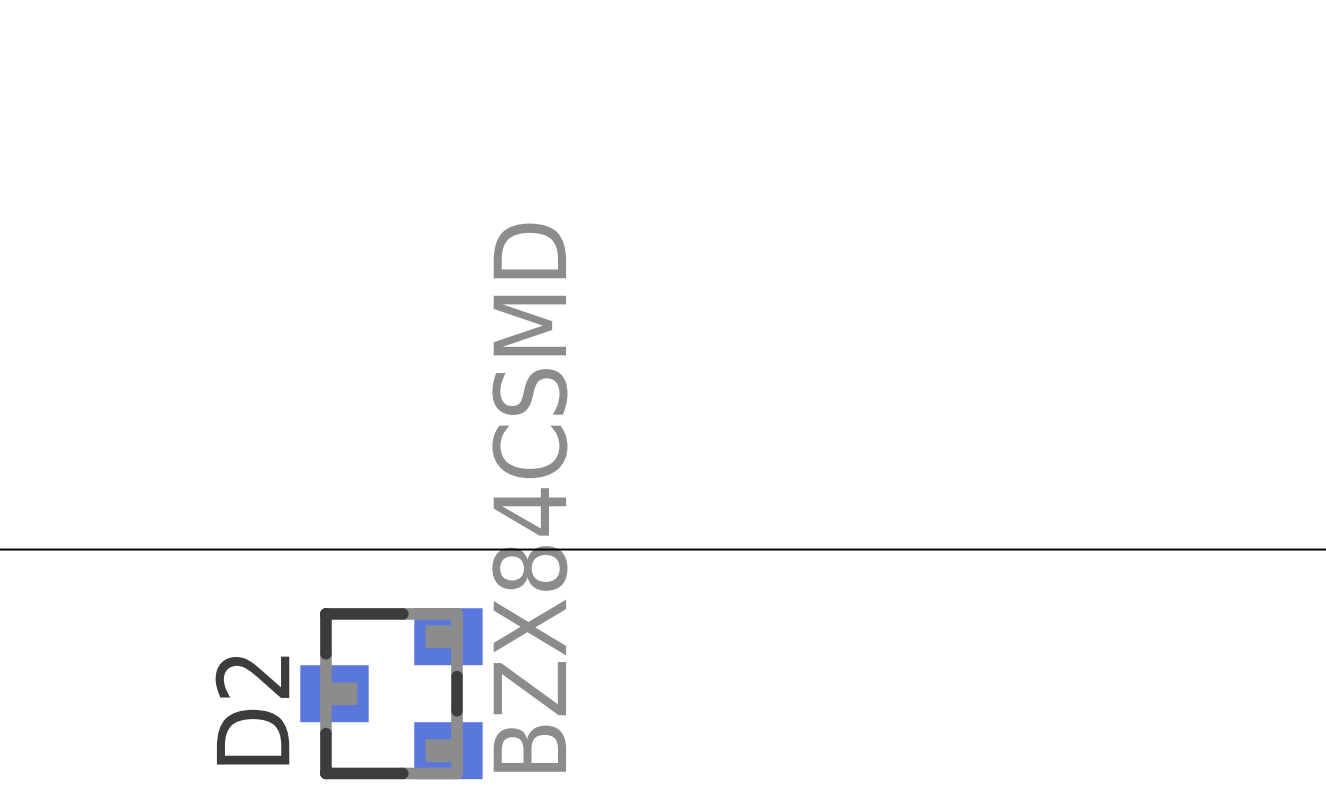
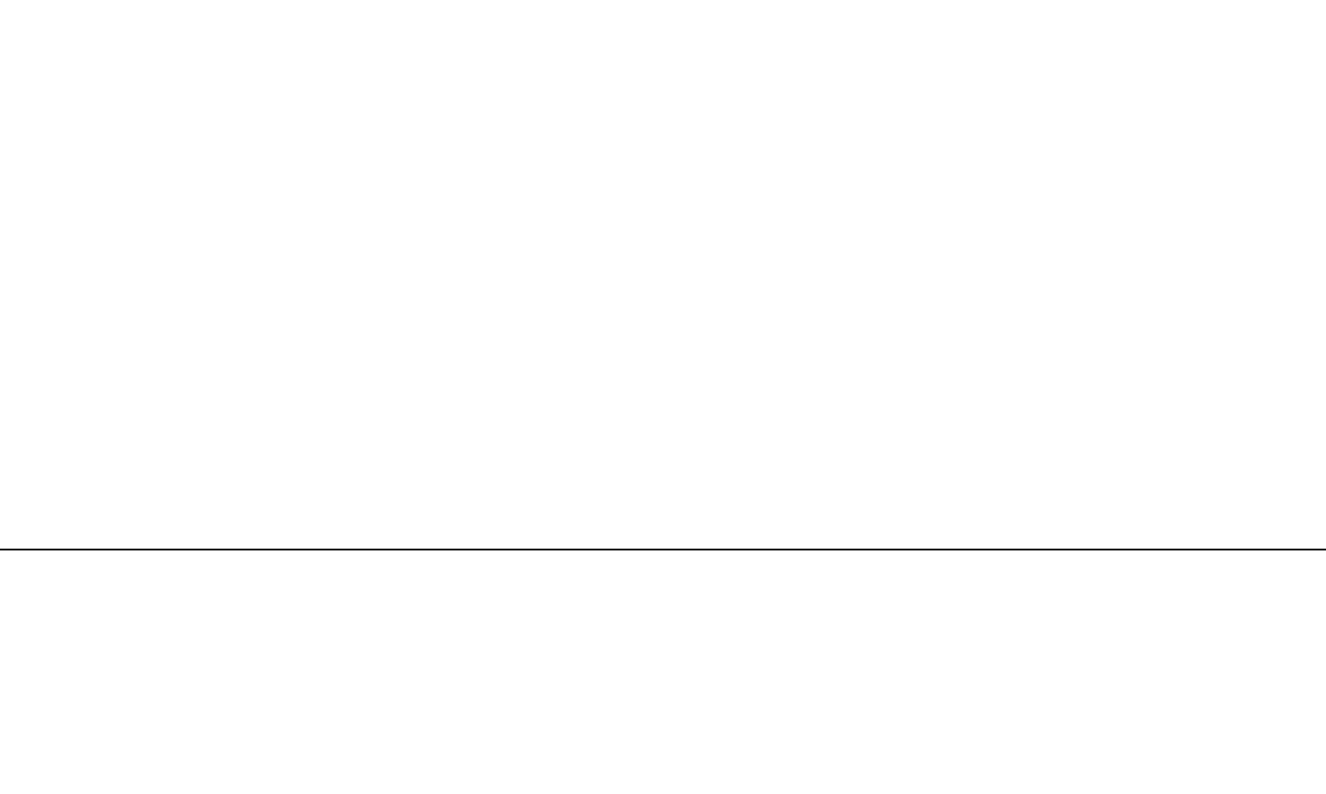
D2: BZX84CSMD (391, 693) -> none

